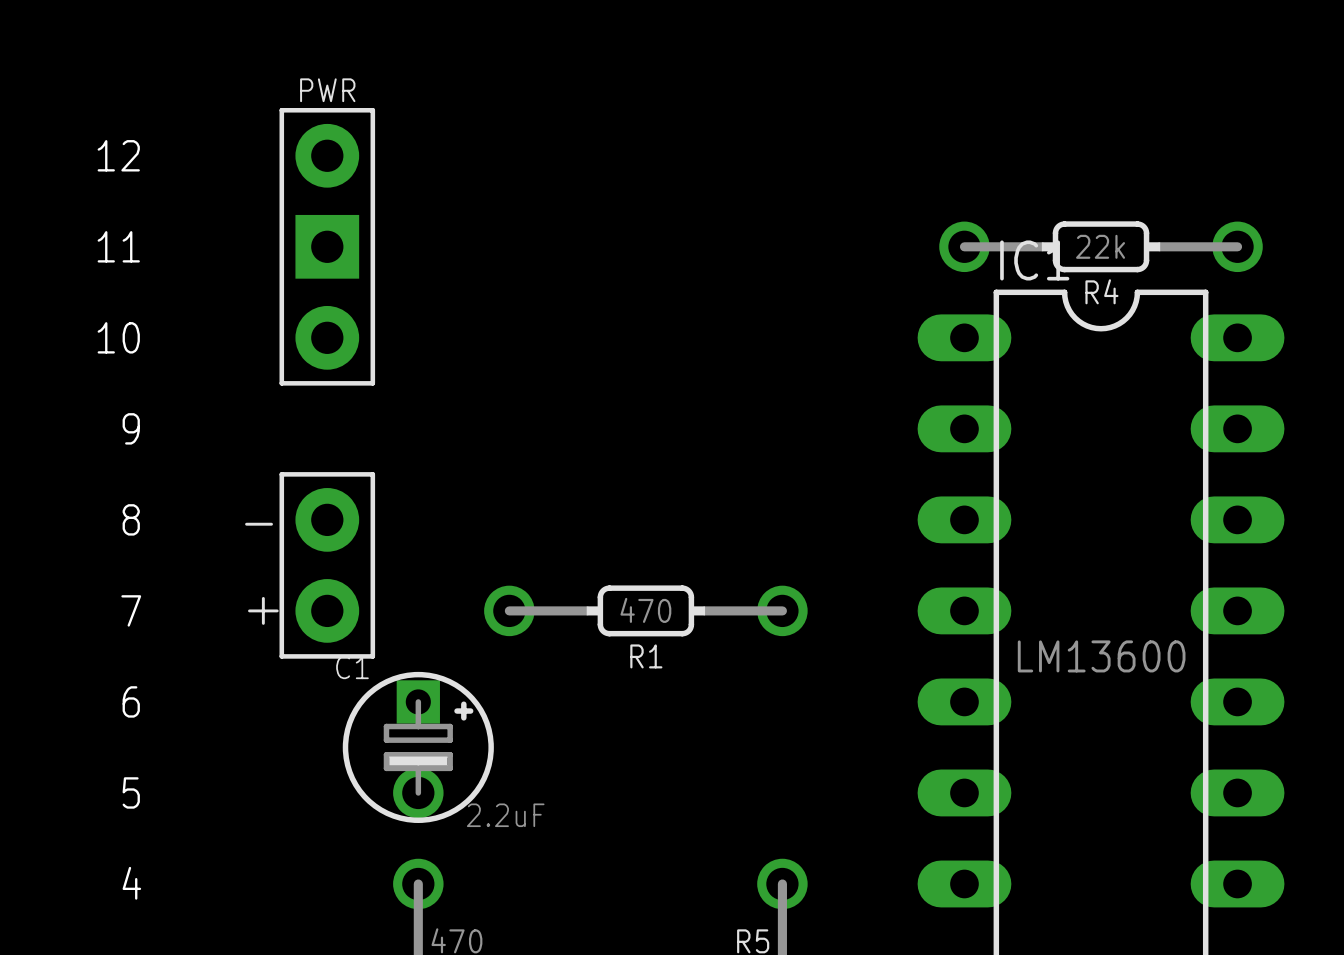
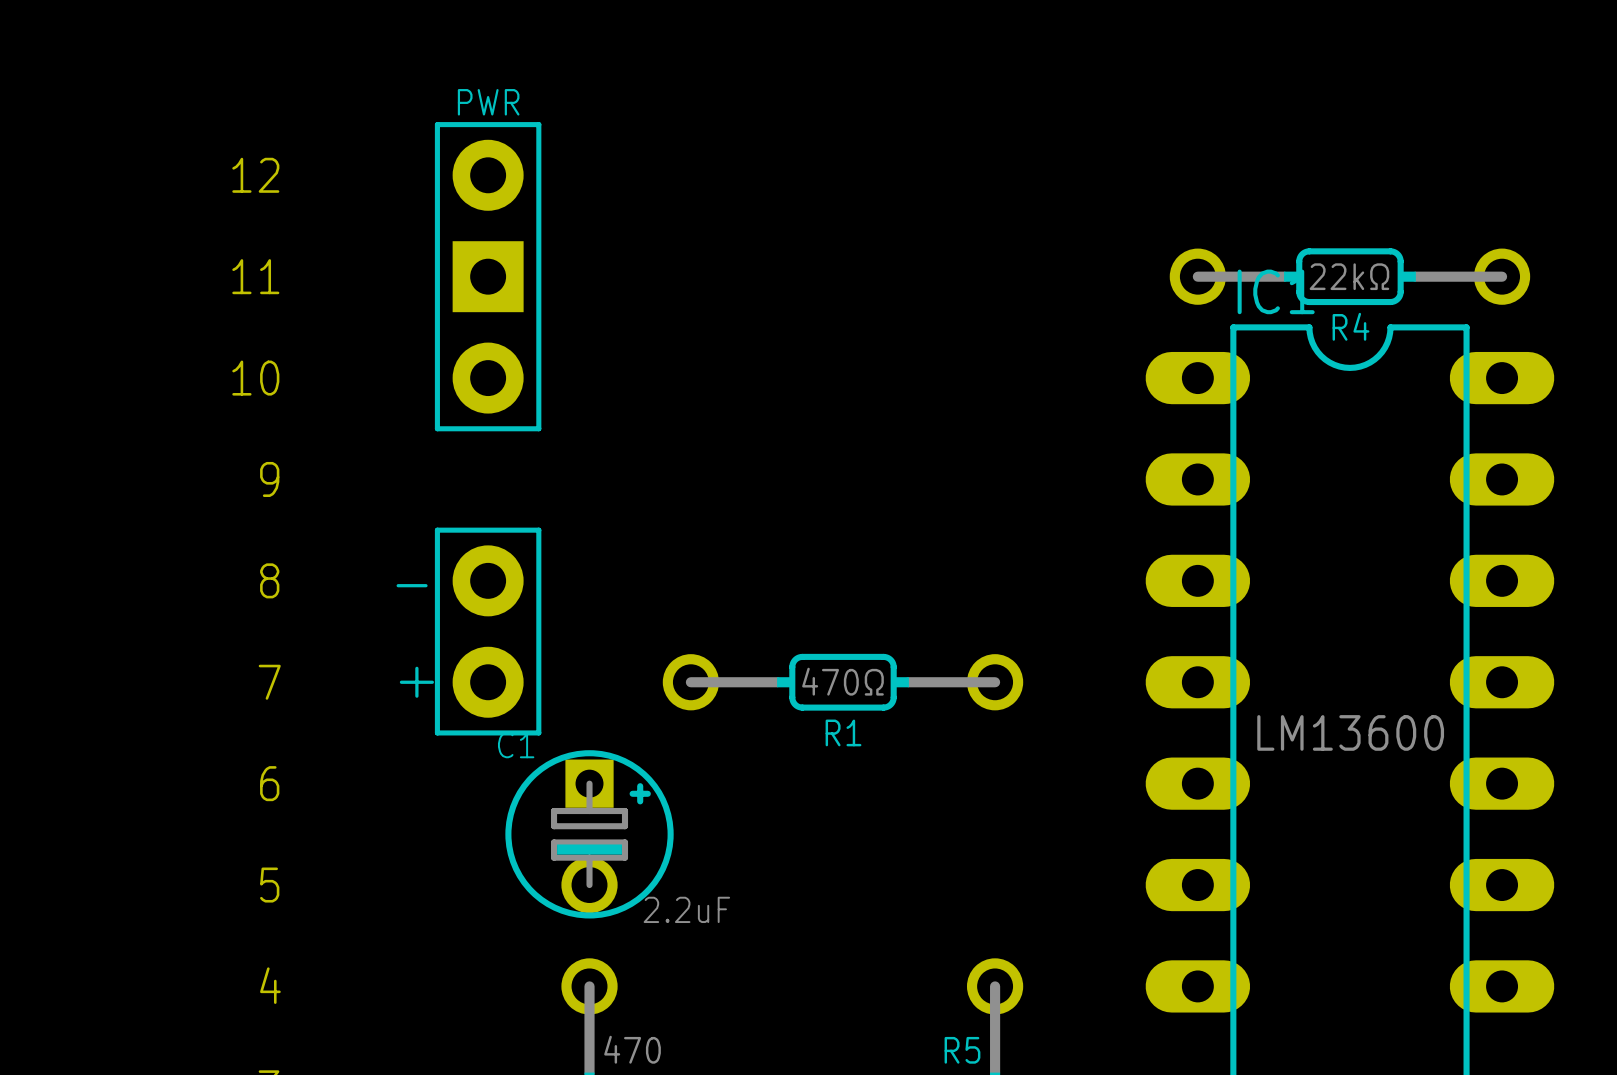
R4 value: 22k (1100, 246) -> 22kΩ (1349, 276)
R1 value: 470 (645, 610) -> 470Ω (842, 681)

